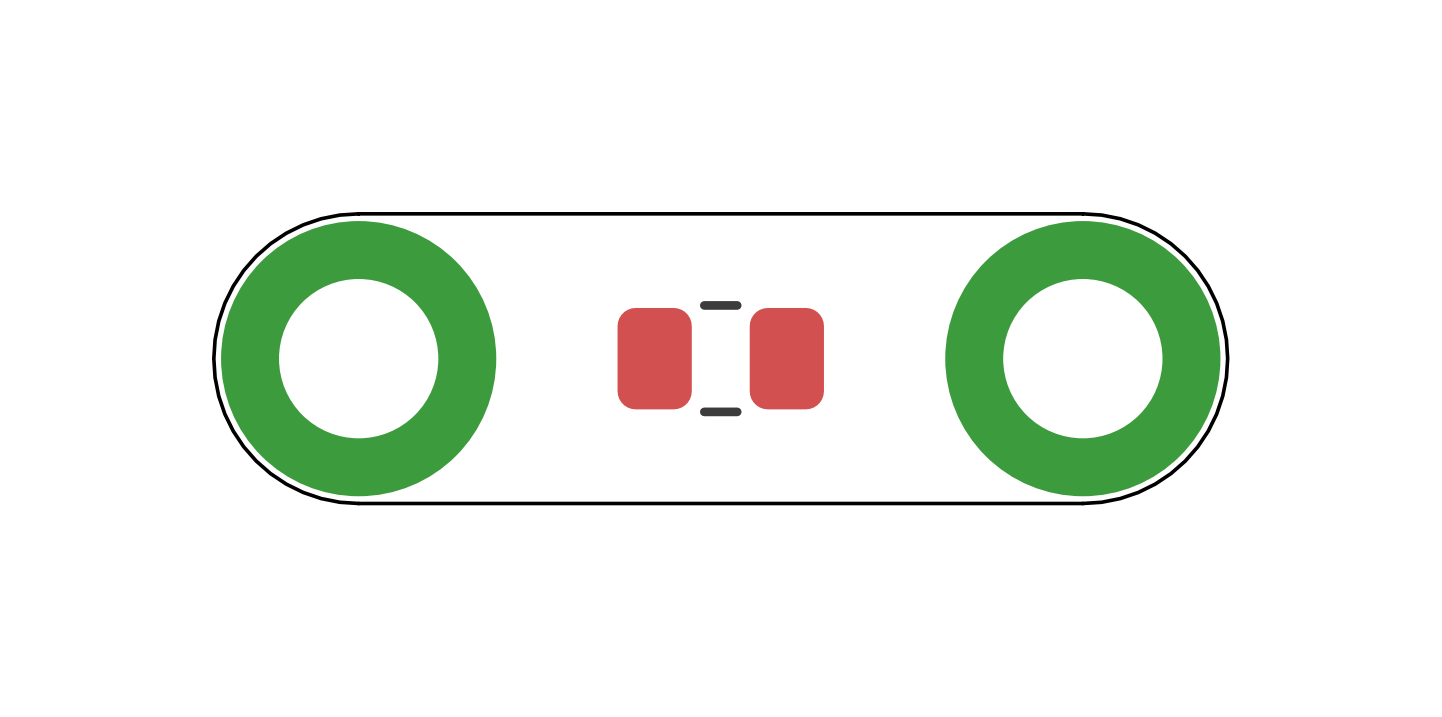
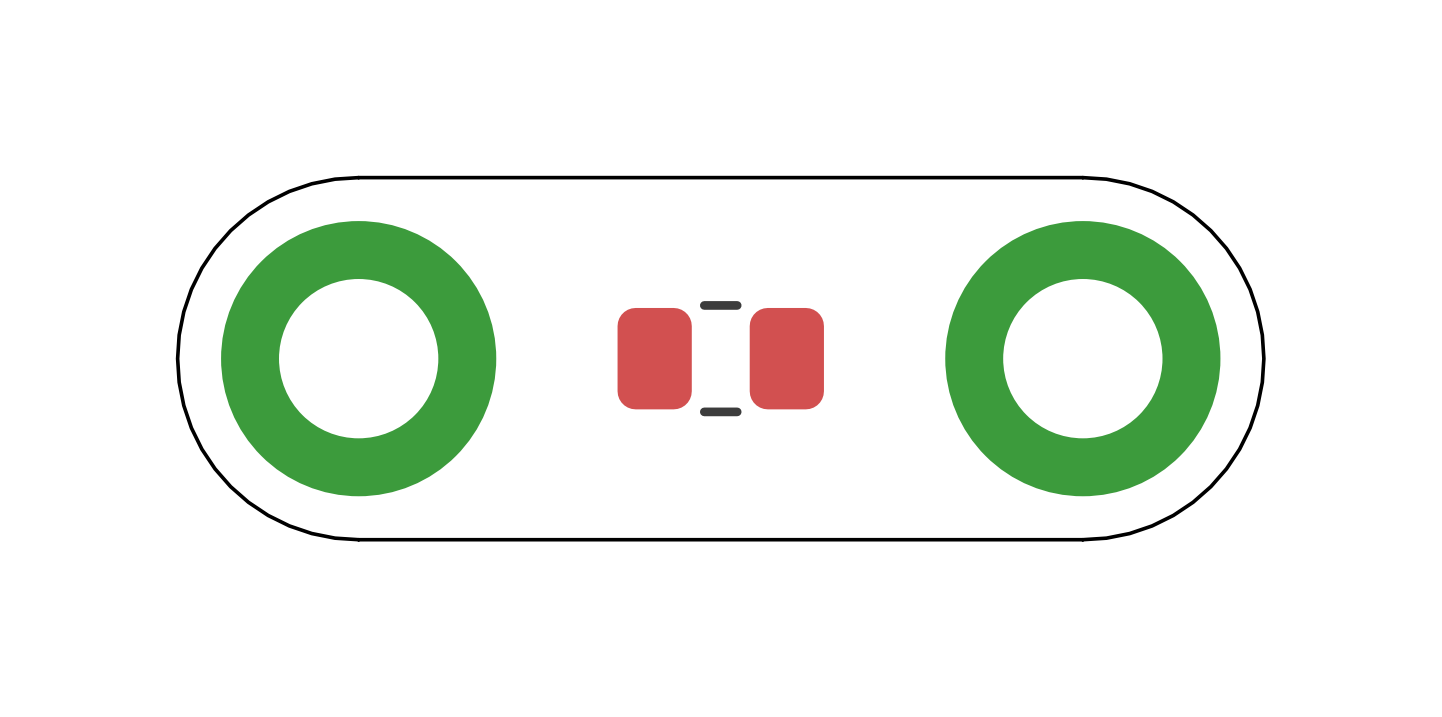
board edge: (358, 213) (1082, 213) (1120, 218) (1138, 224) (1171, 243) (1197, 270) (1208, 286) (1216, 303) (1226, 339) (1227, 358) (1222, 396) (1208, 431) (1197, 446) (1171, 473) (1138, 492) (1101, 502) (358, 503) (321, 498) (303, 492) (270, 473) (243, 446) (233, 431) (224, 414) (215, 377) (215, 339) (224, 303) (233, 286) (243, 270) (270, 243) (303, 224) (321, 218) (358, 213) -> (358, 177) (335, 179) (311, 183) (289, 191) (268, 201) (248, 215) (230, 230) (215, 248) (201, 268) (191, 289) (183, 311) (179, 335) (177, 358) (179, 382) (183, 405) (191, 427) (201, 449) (215, 468) (230, 486) (248, 502) (268, 515) (289, 525) (311, 533) (335, 538) (358, 539) (1106, 538) (1129, 533) (1152, 525) (1173, 515) (1193, 502) (1210, 486) (1226, 468) (1239, 449) (1250, 427) (1257, 405) (1262, 382) (1263, 358) (1262, 335) (1257, 311) (1250, 289) (1239, 268) (1226, 248) (1210, 230) (1193, 215) (1173, 201) (1152, 191) (1129, 183) (1106, 179) (1082, 177) (358, 177)

